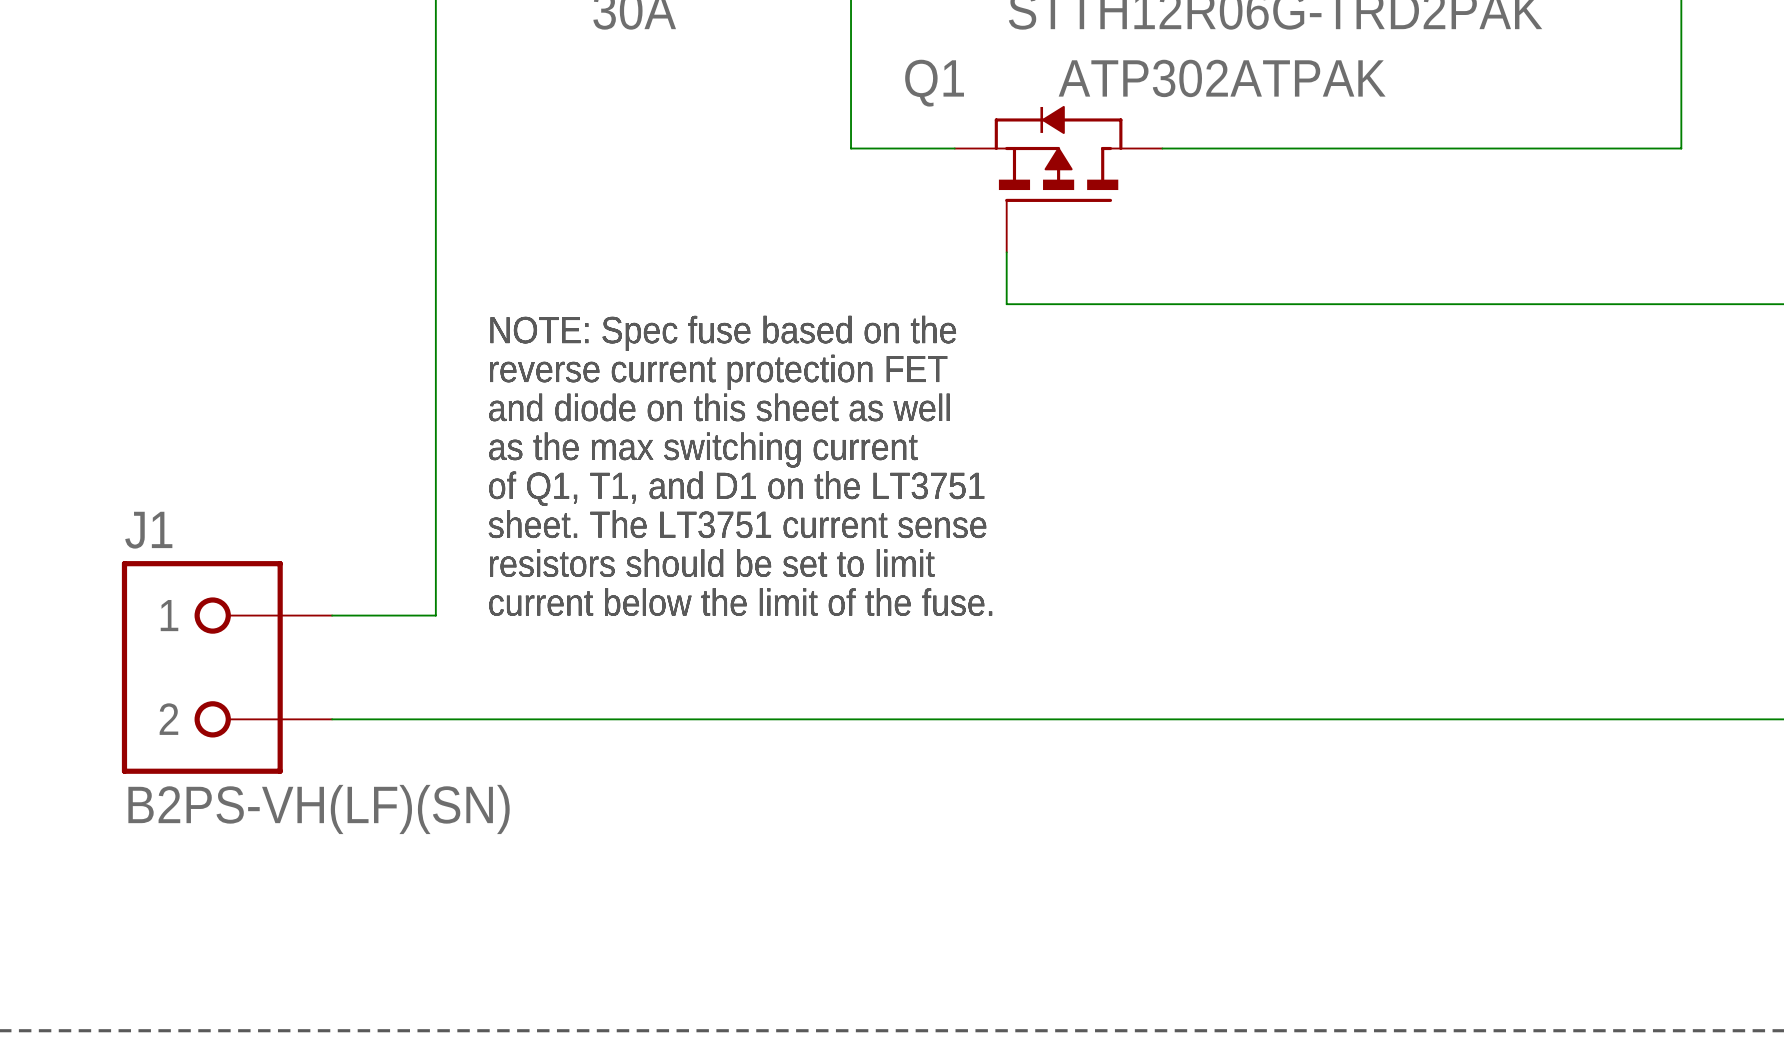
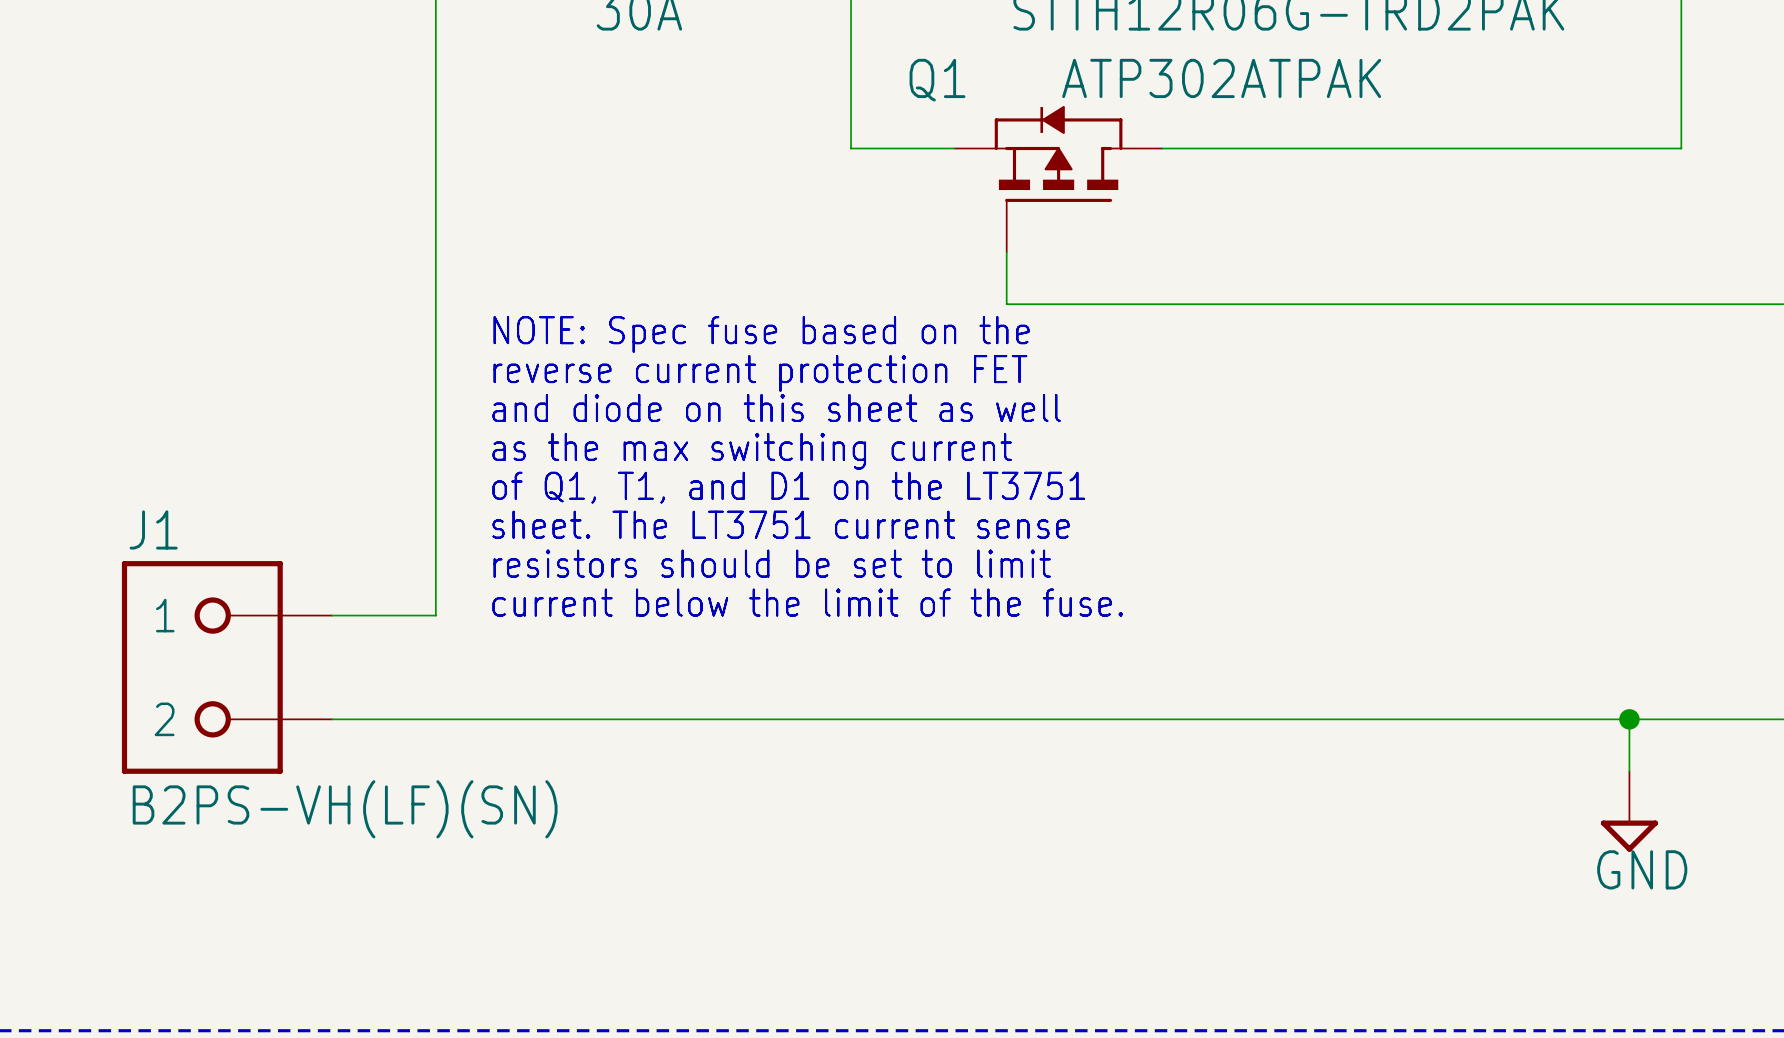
wire: none -> (1629, 719) (1629, 771)
junction: none -> (1629, 719)
power symbol: none -> GND (1629, 811)

